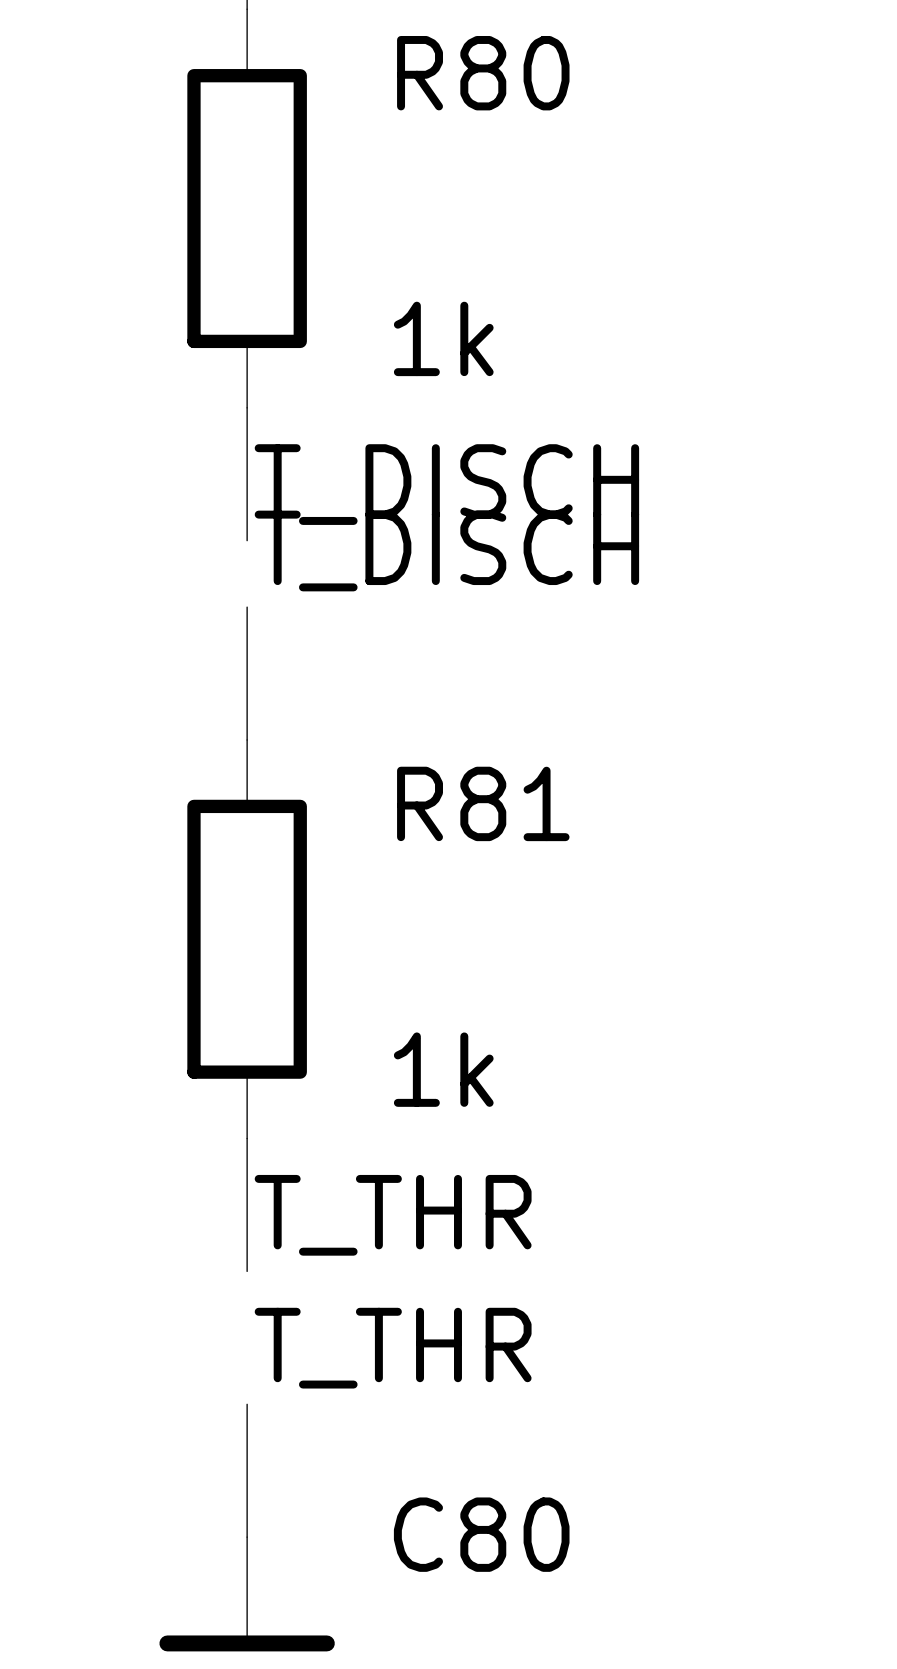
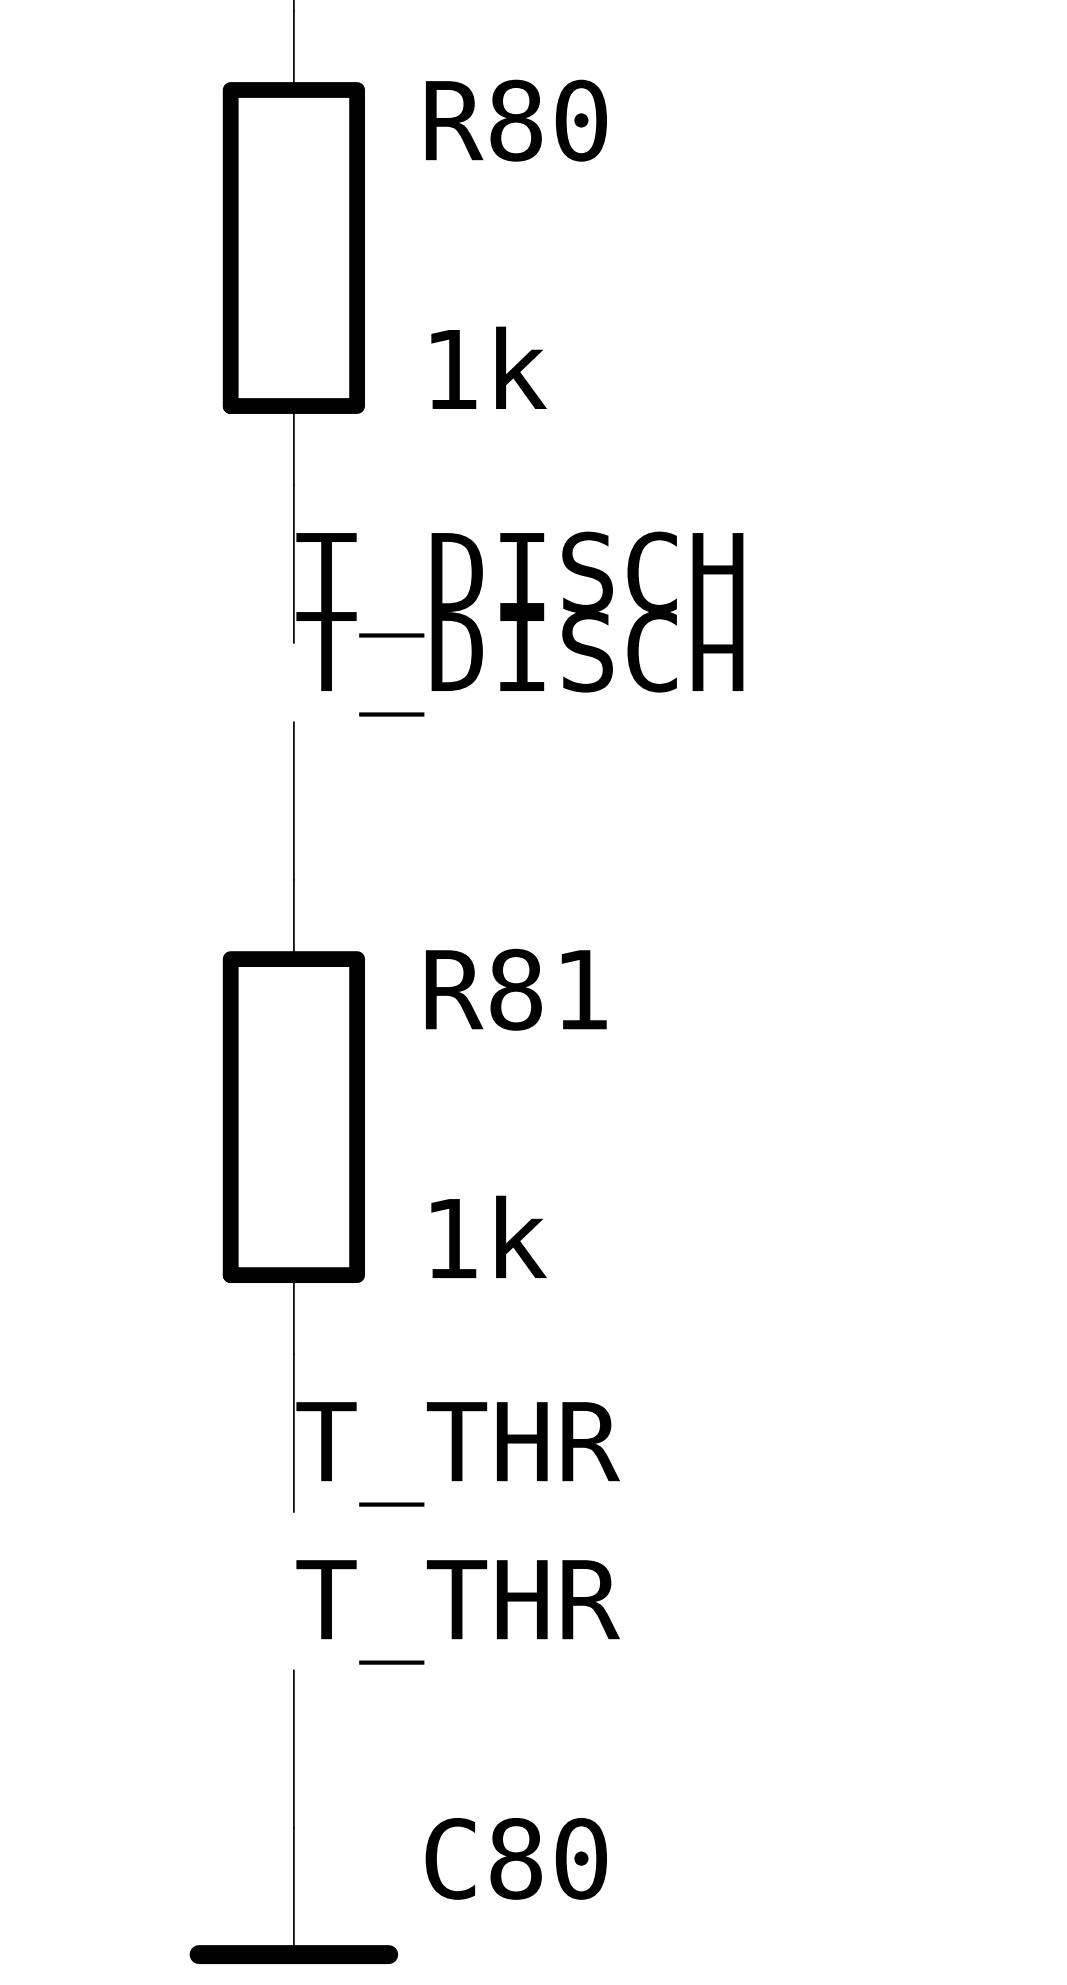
R80 name position: R80 (483, 73) -> R80 (516, 120)
R80 value position: 1k (443, 338) -> 1k (489, 367)
R81 name position: R81 (483, 803) -> R81 (516, 989)
R81 value position: 1k (443, 1069) -> 1k (489, 1236)
C80 name position: C80 (481, 1534) -> C80 (516, 1858)

